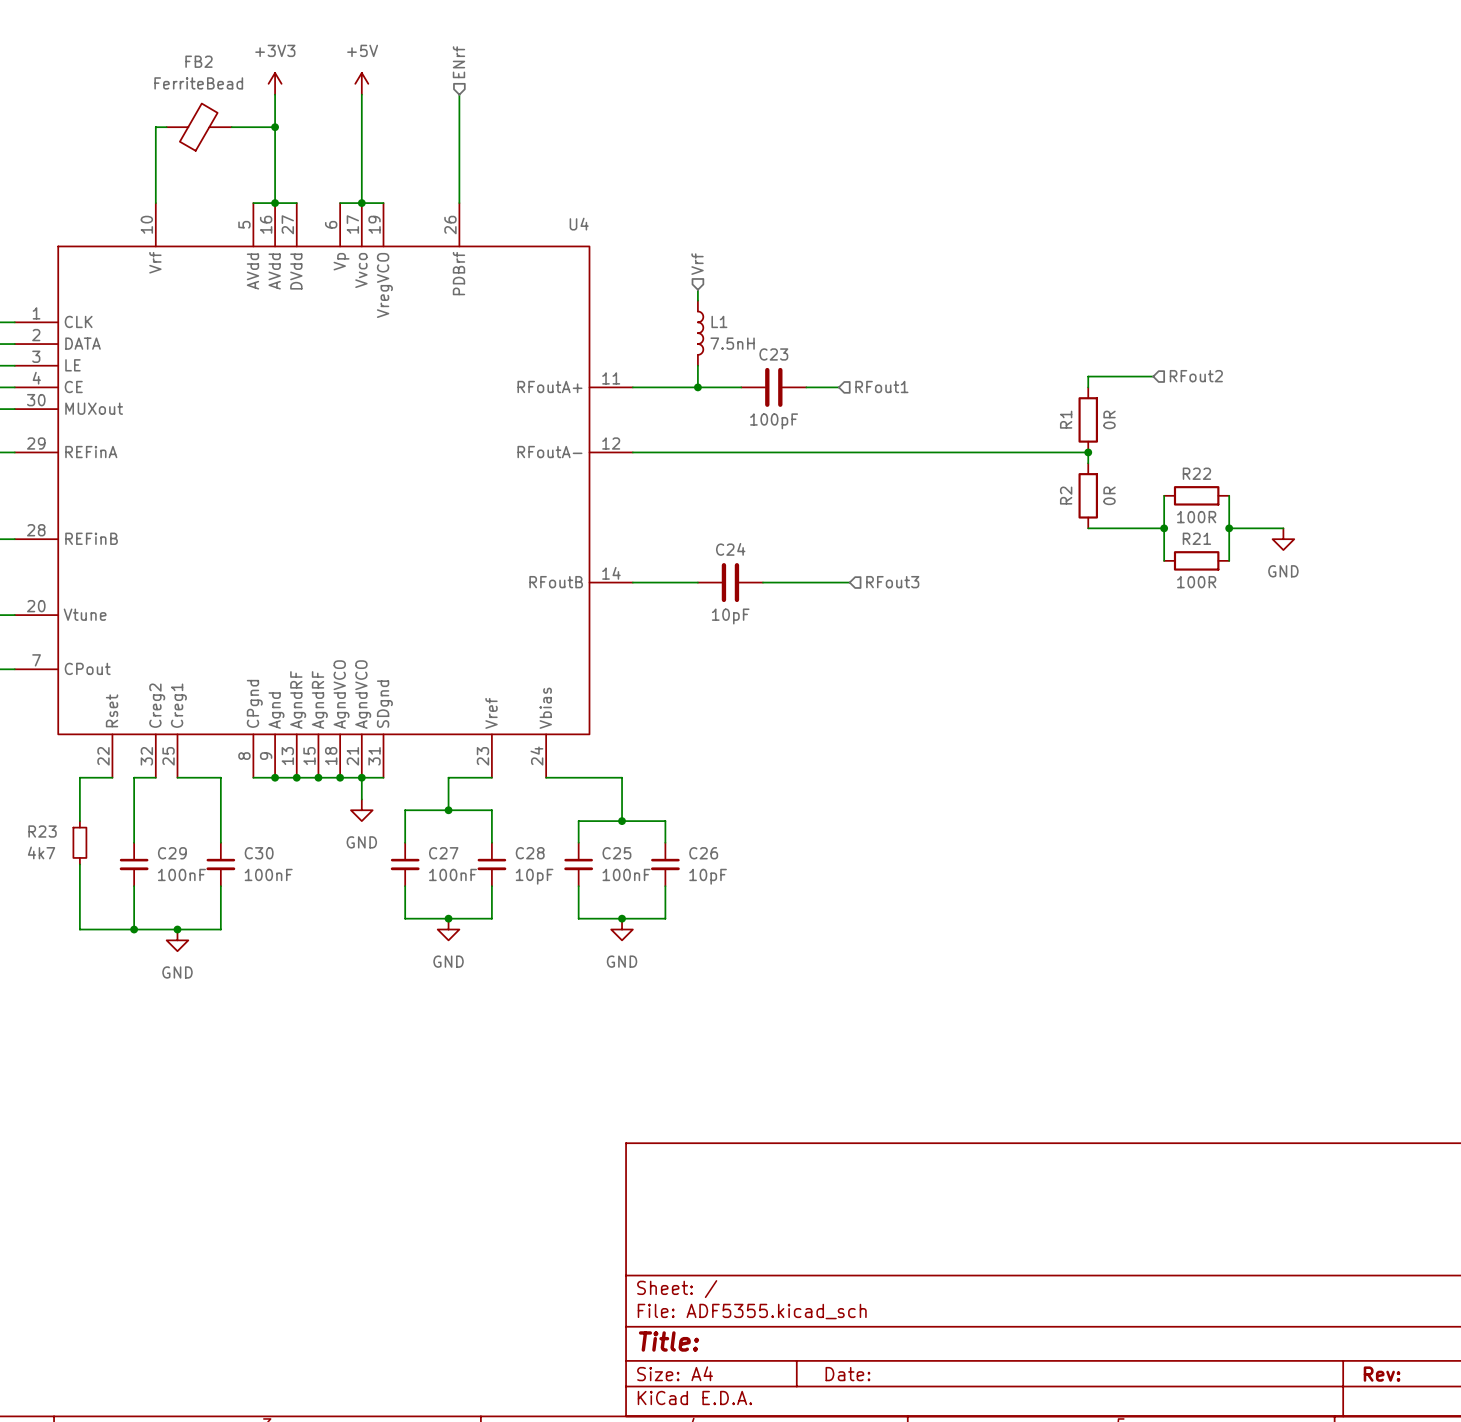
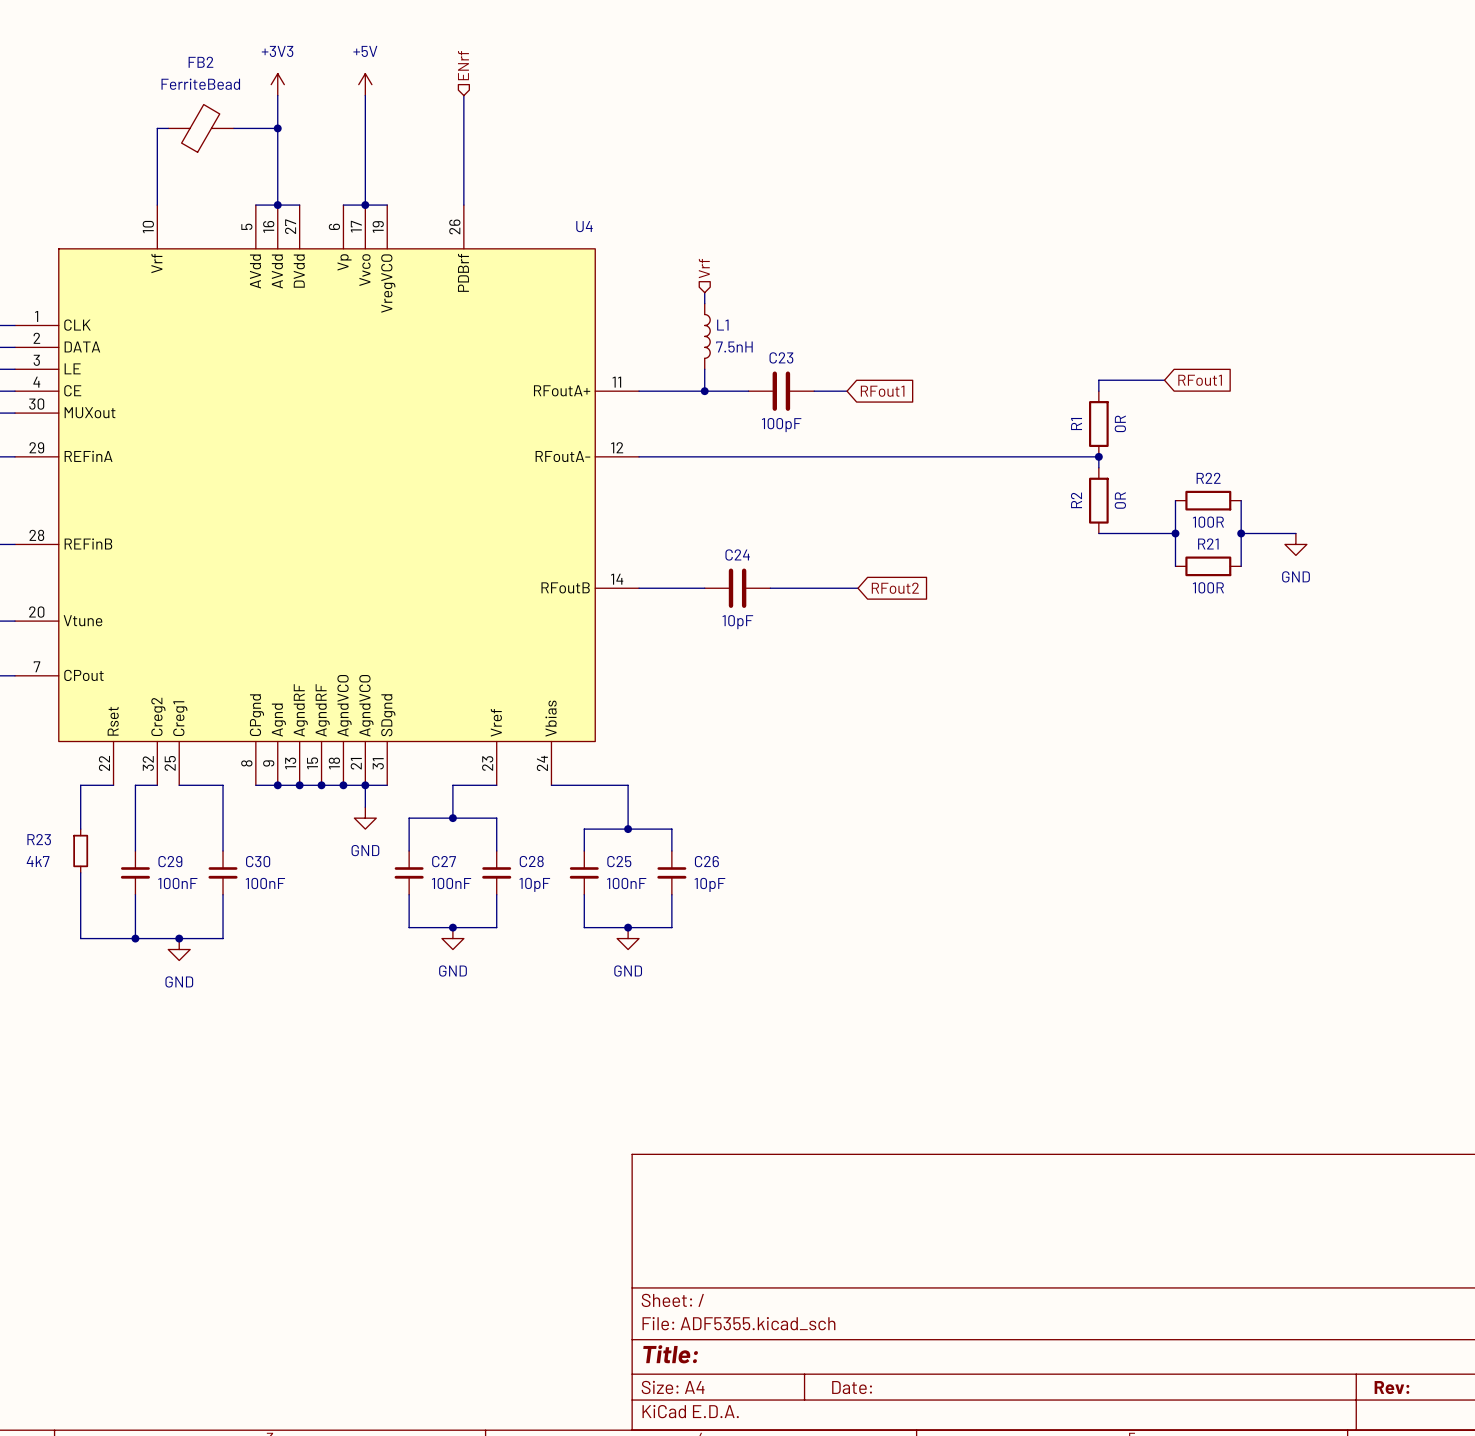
global label: none -> RFout1 (1200, 380)
hierarchical label: RFout2 (1196, 376) -> none
hierarchical label: RFout1 (881, 386) -> none
global label: none -> RFout1 (882, 391)
global label: none -> RFout2 (895, 588)
hierarchical label: RFout3 (892, 582) -> none

